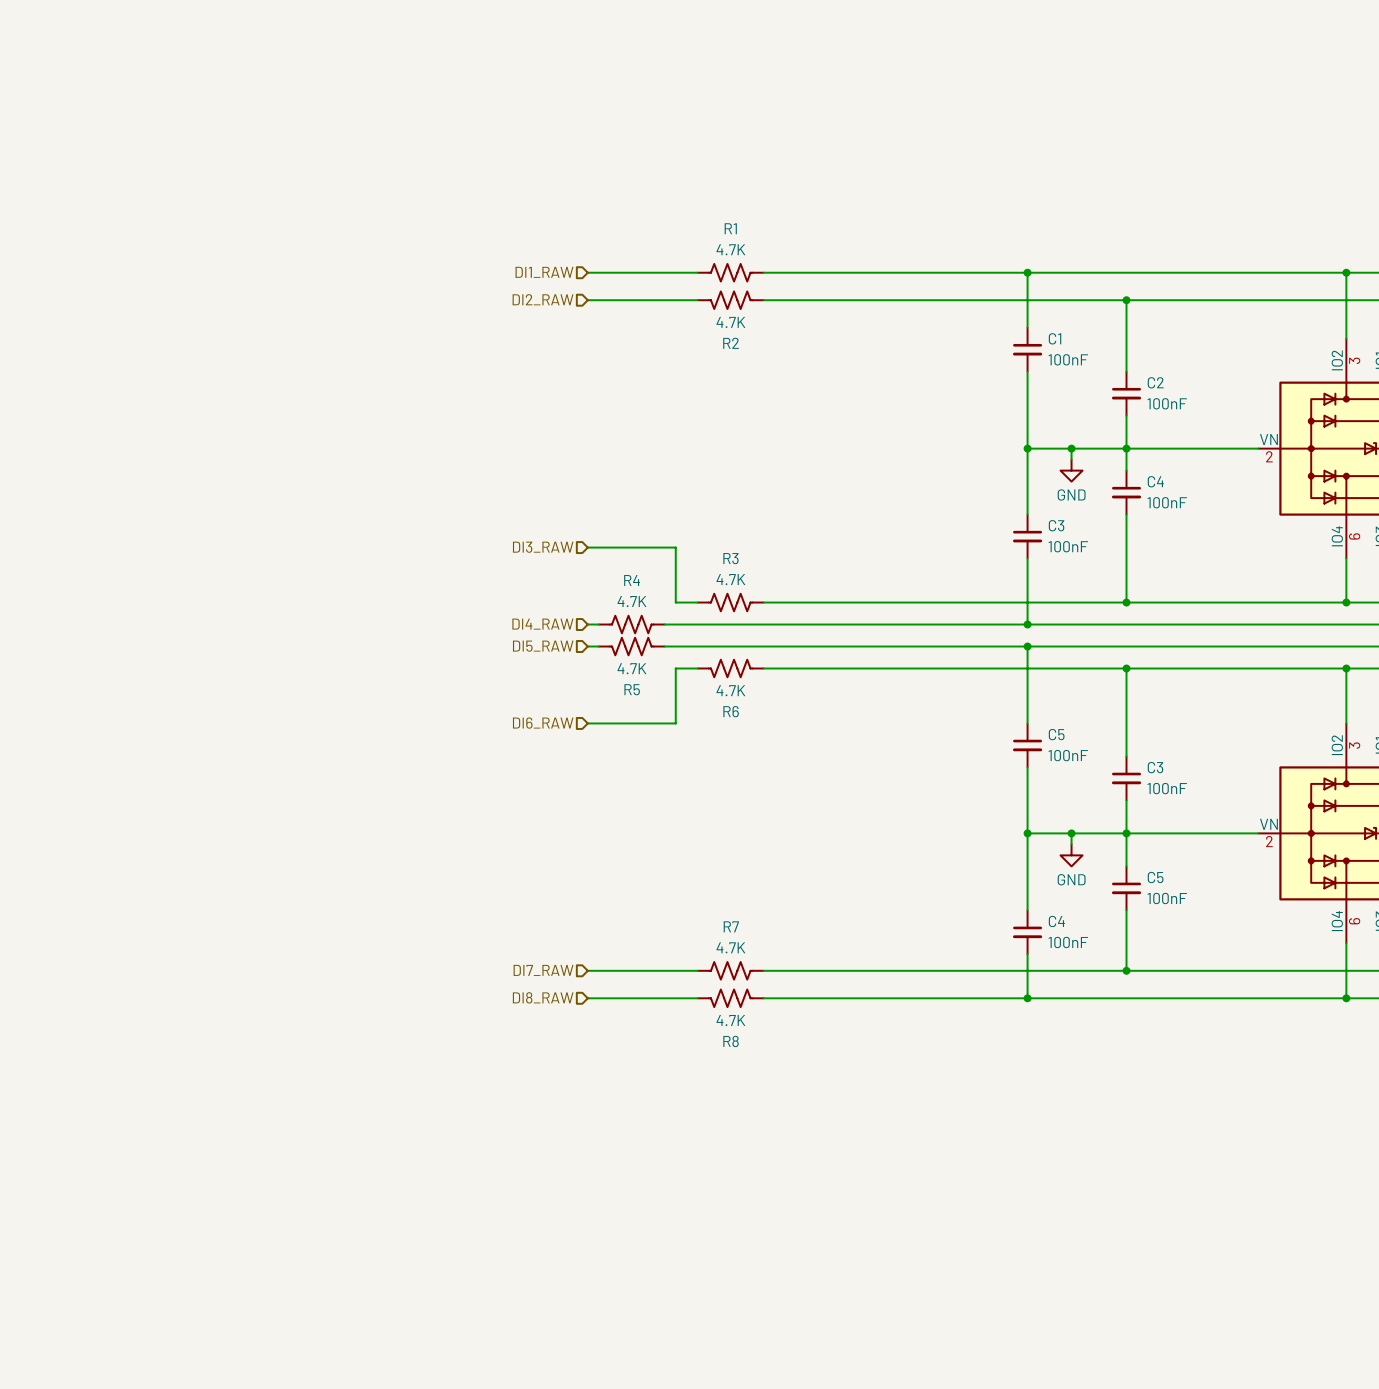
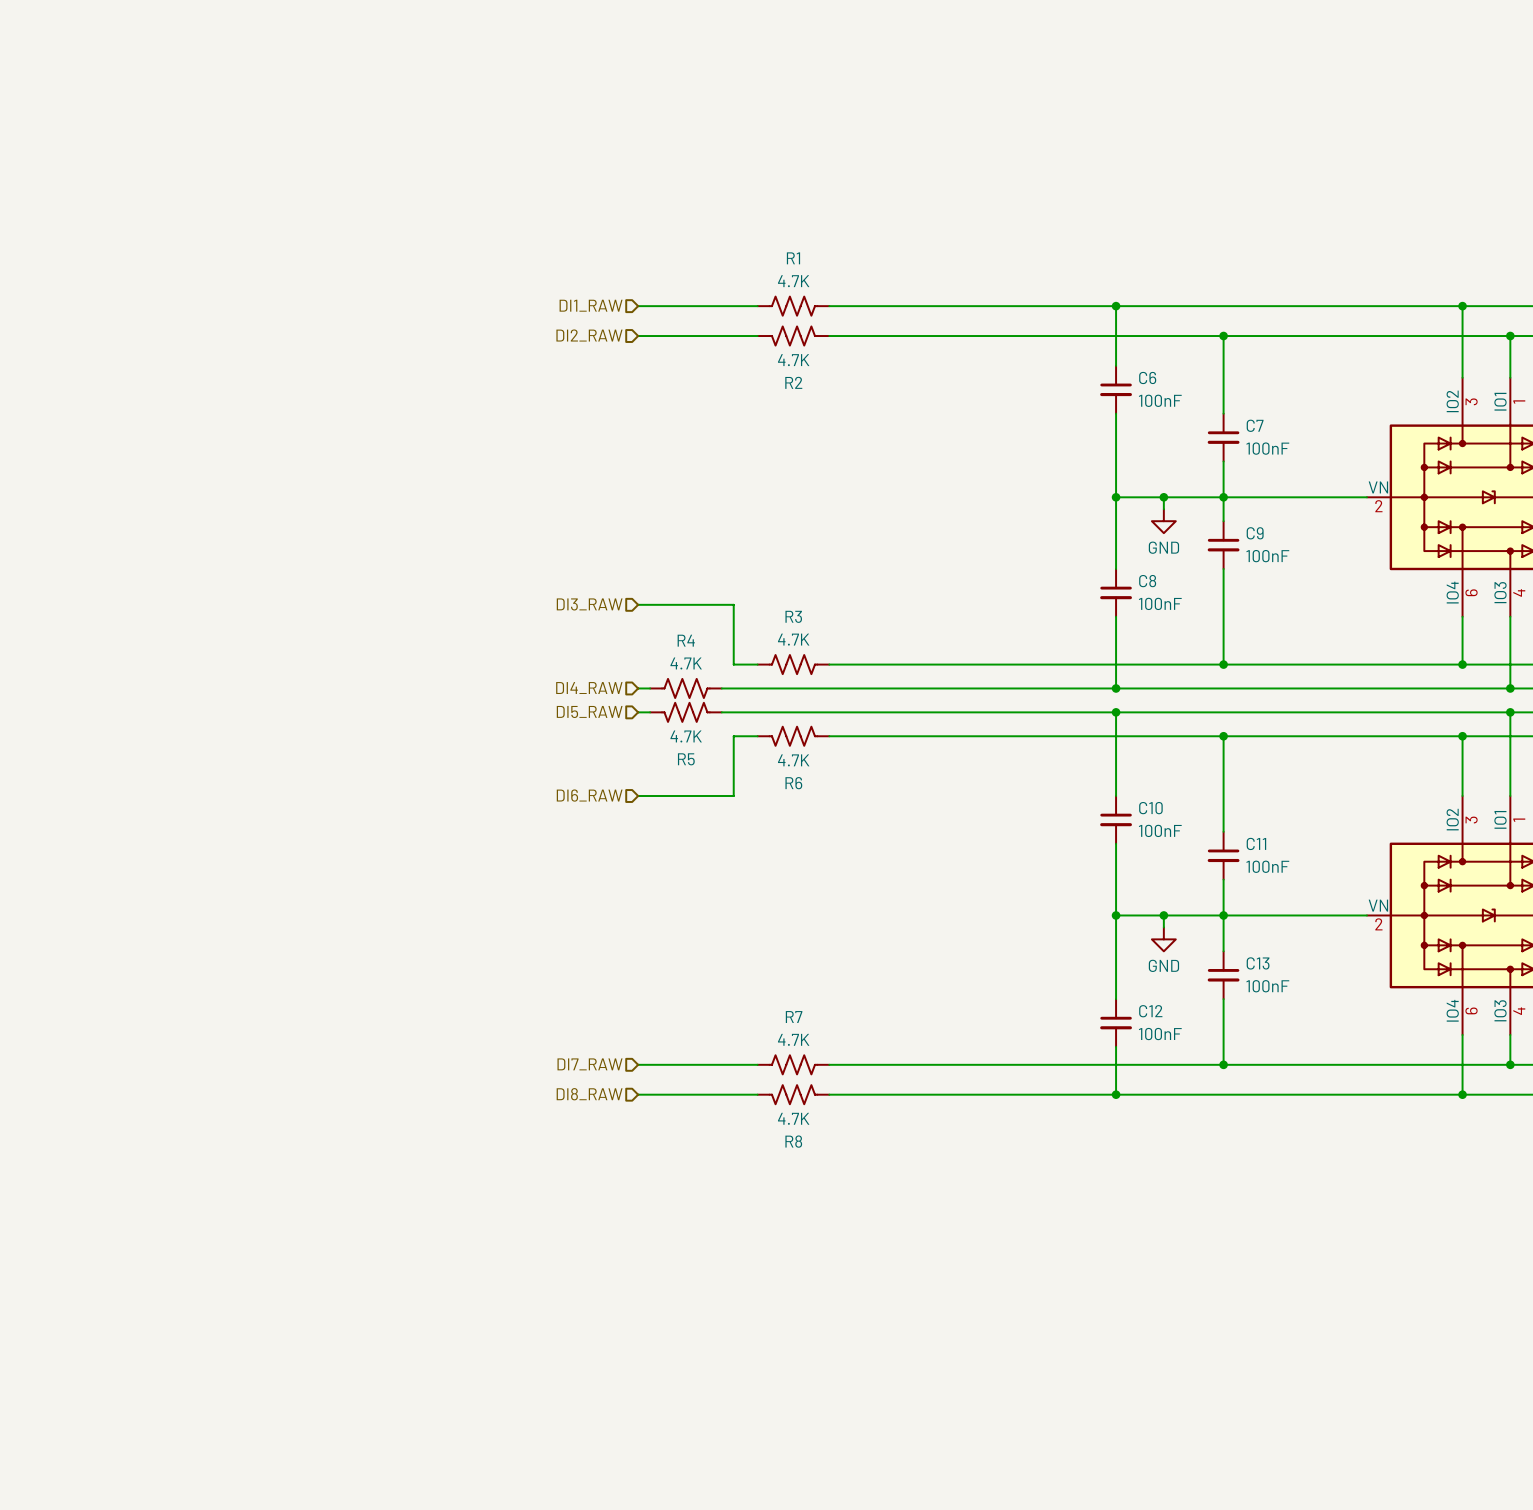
C1 name: C1 (1055, 338) -> C6 (1147, 377)
C2 name: C2 (1155, 382) -> C7 (1255, 425)
C4 name: C4 (1155, 481) -> C9 (1255, 533)
C3 name: C3 (1056, 525) -> C8 (1147, 581)
C5 name: C5 (1056, 734) -> C10 (1150, 808)
C3 name: C3 (1155, 767) -> C11 (1256, 843)
C5 name: C5 (1155, 877) -> C13 (1258, 963)
C4 name: C4 (1056, 921) -> C12 (1150, 1011)

